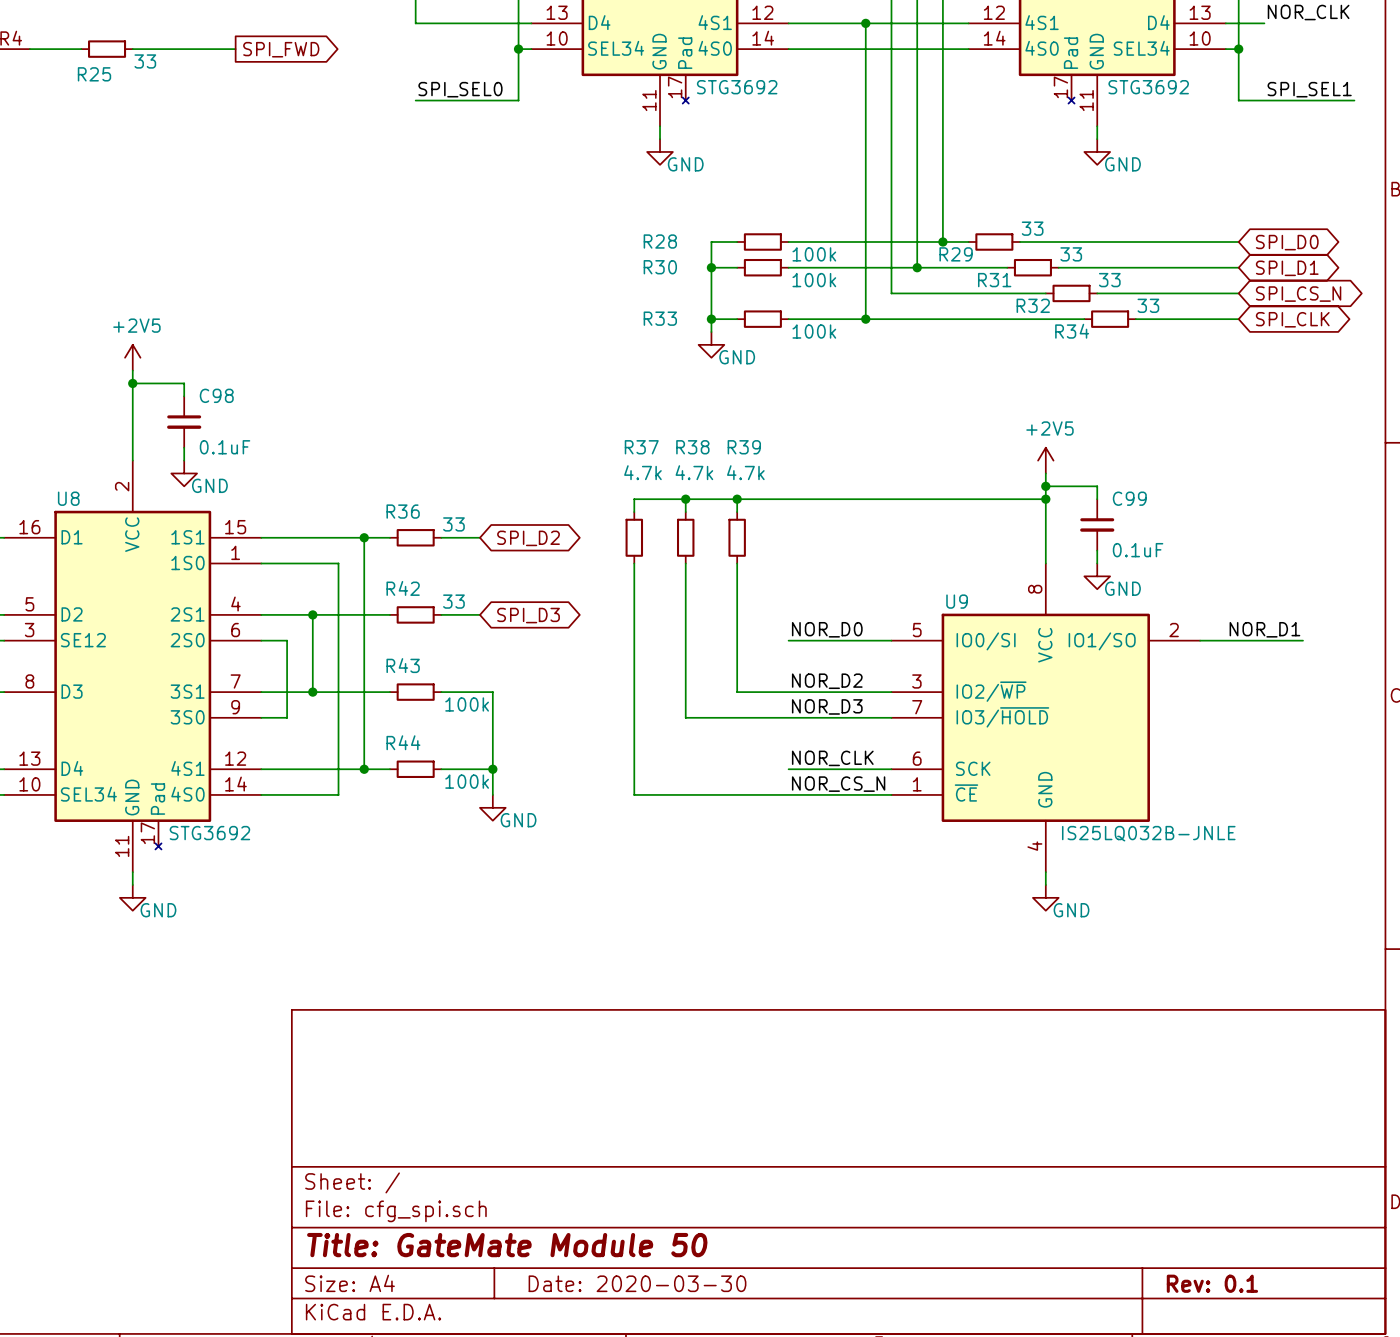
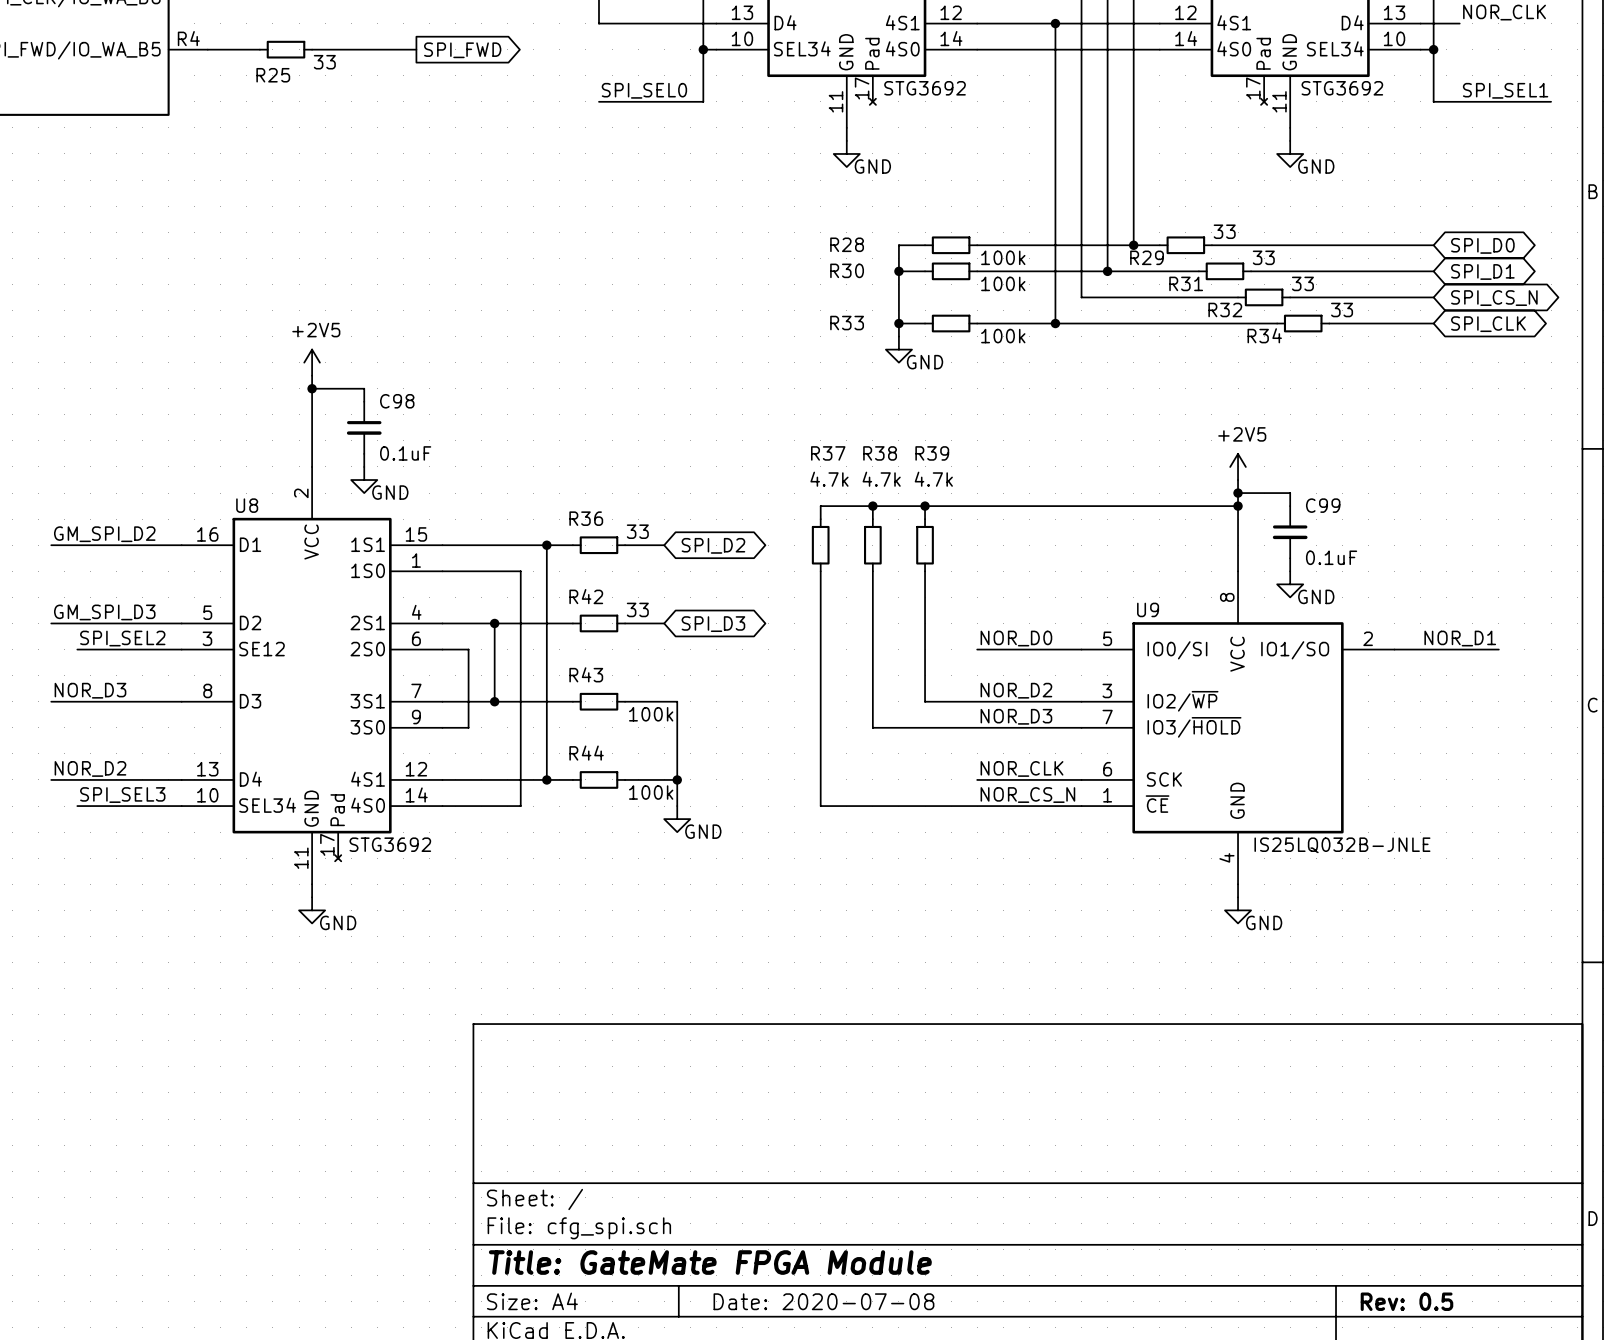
title block: Title: GateMate Module 50 (507, 1245) -> Title: GateMate FPGA Module (710, 1262)
title block: Date: 2020-03-30 (637, 1283) -> Date: 2020-07-08 (823, 1301)
title block: Rev: 0.1 (1212, 1283) -> Rev: 0.5 (1406, 1301)

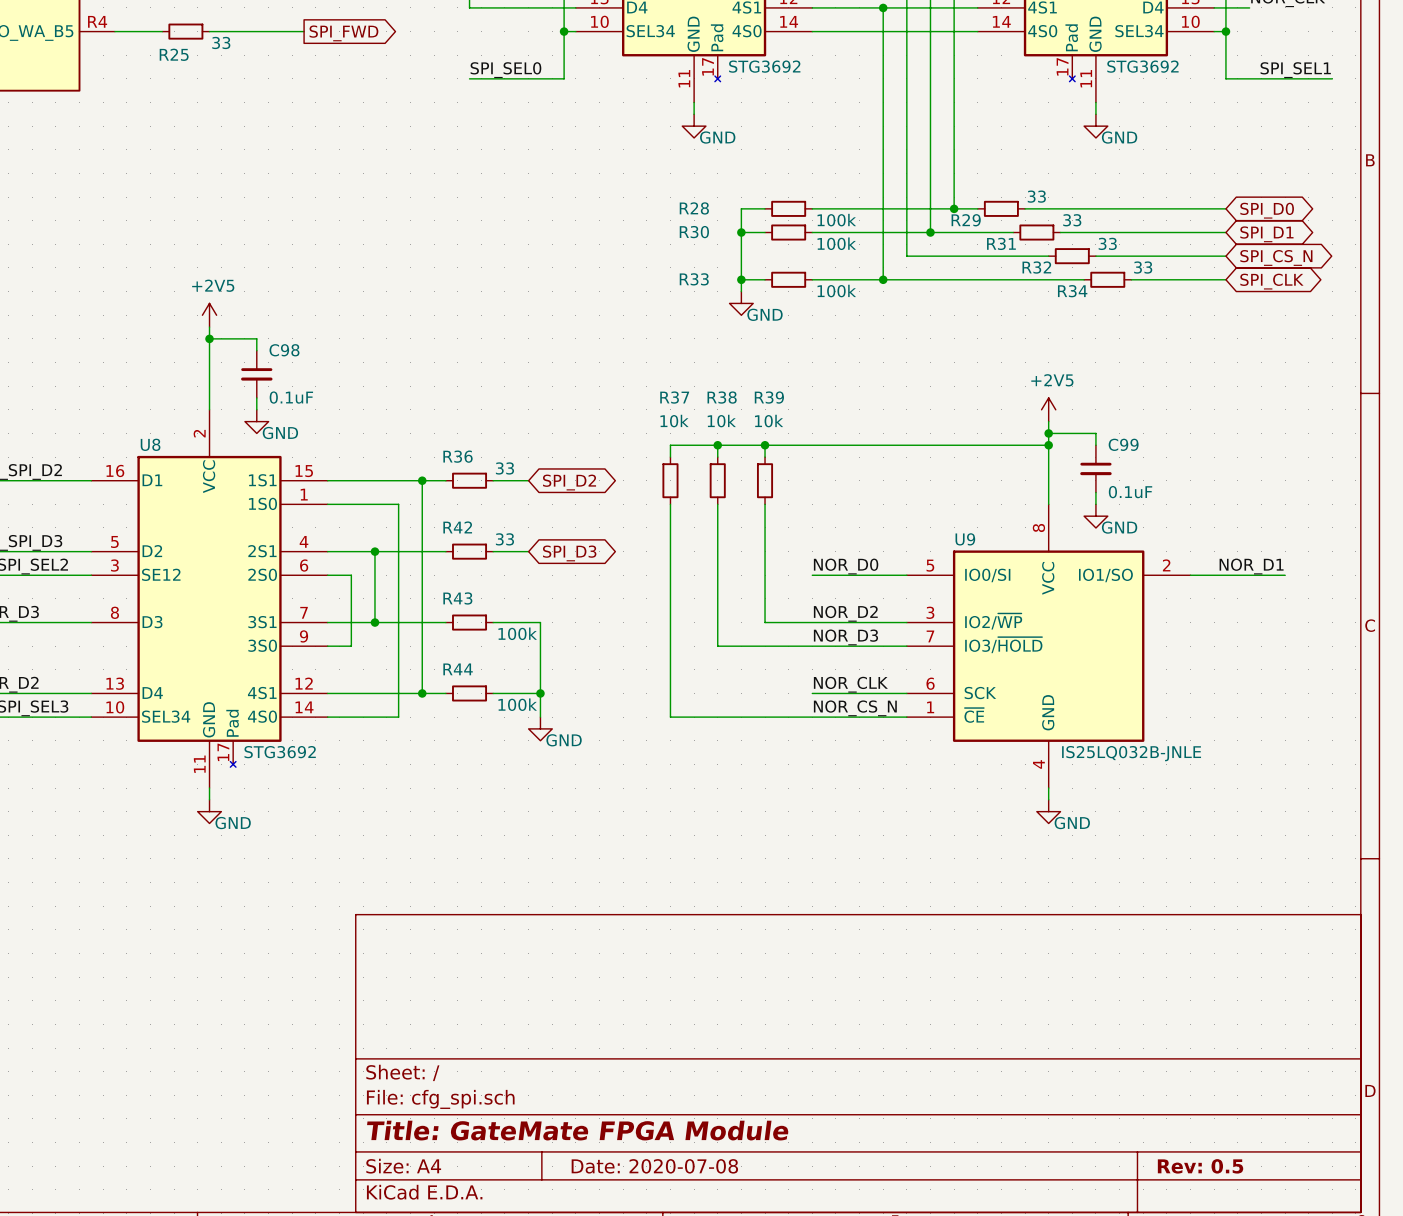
R37 value: 4.7k (829, 479) -> 10k (674, 421)
R38 value: 4.7k (881, 479) -> 10k (721, 421)
R39 value: 4.7k (933, 479) -> 10k (769, 421)

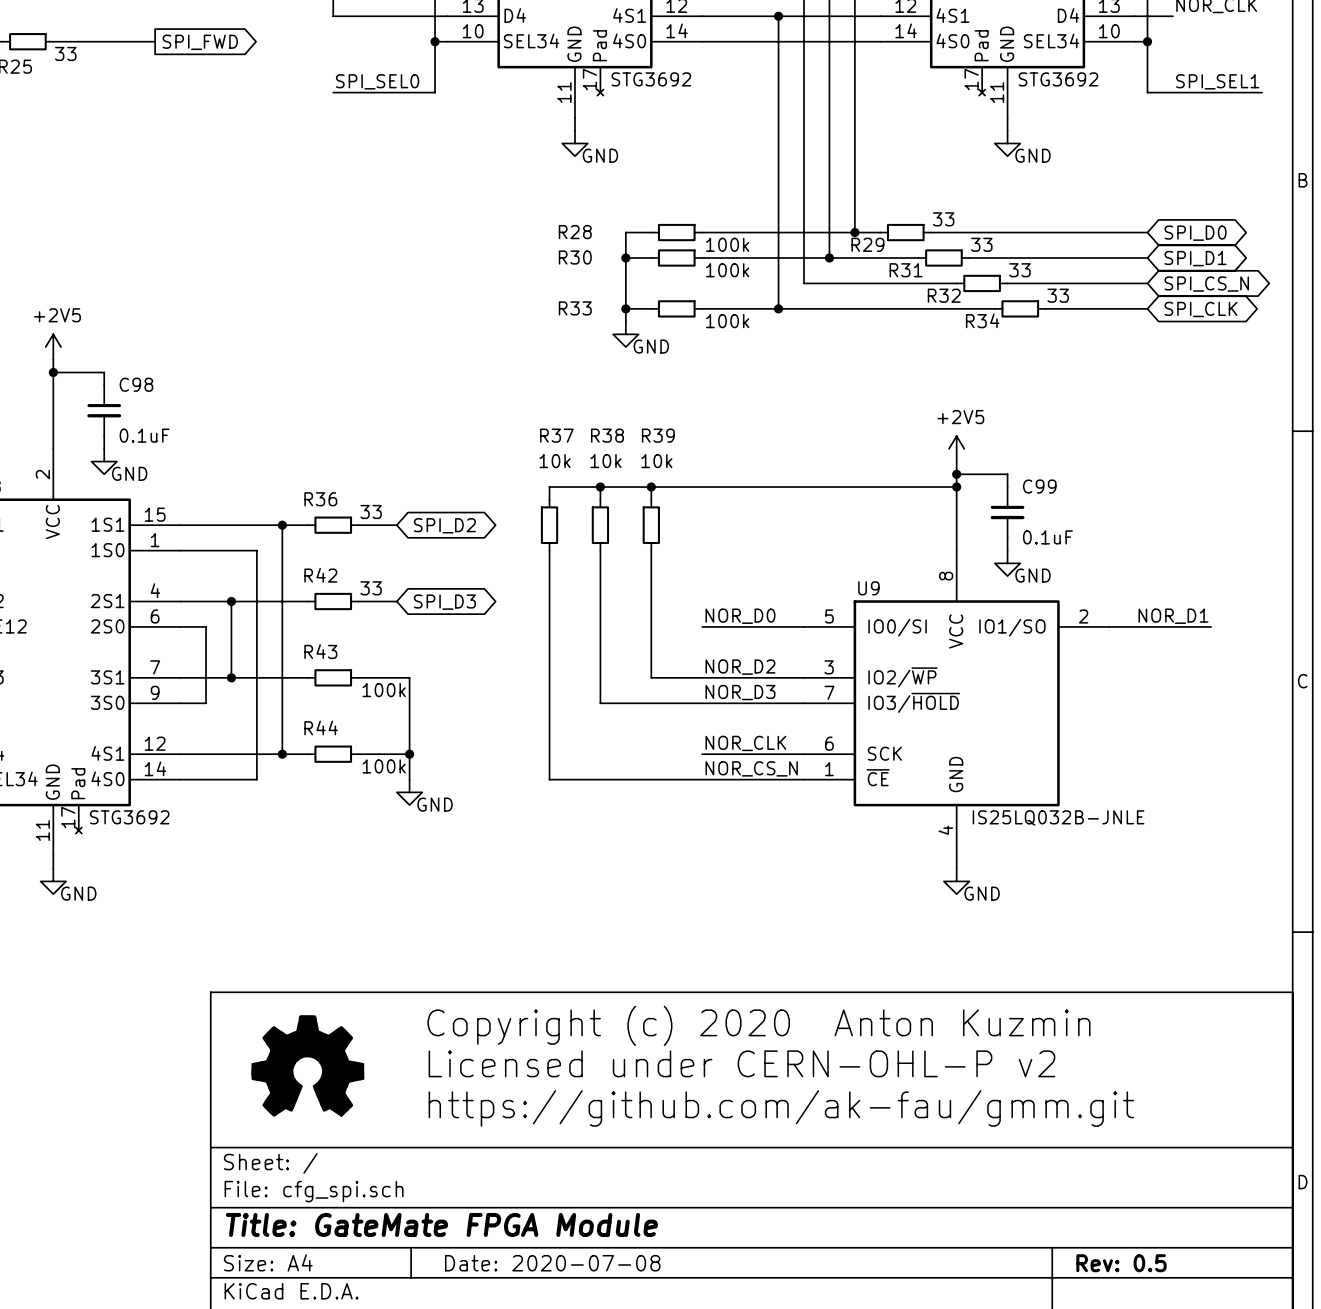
text: none -> Copyright (c) 2020 Anton Kuzmin (758, 1025)
text: none -> Licensed under CERN-OHL-P v2 (741, 1063)
power symbol: none -> (307, 1065)
text: none -> https://github.com/ak-fau/gmm.git (781, 1108)

